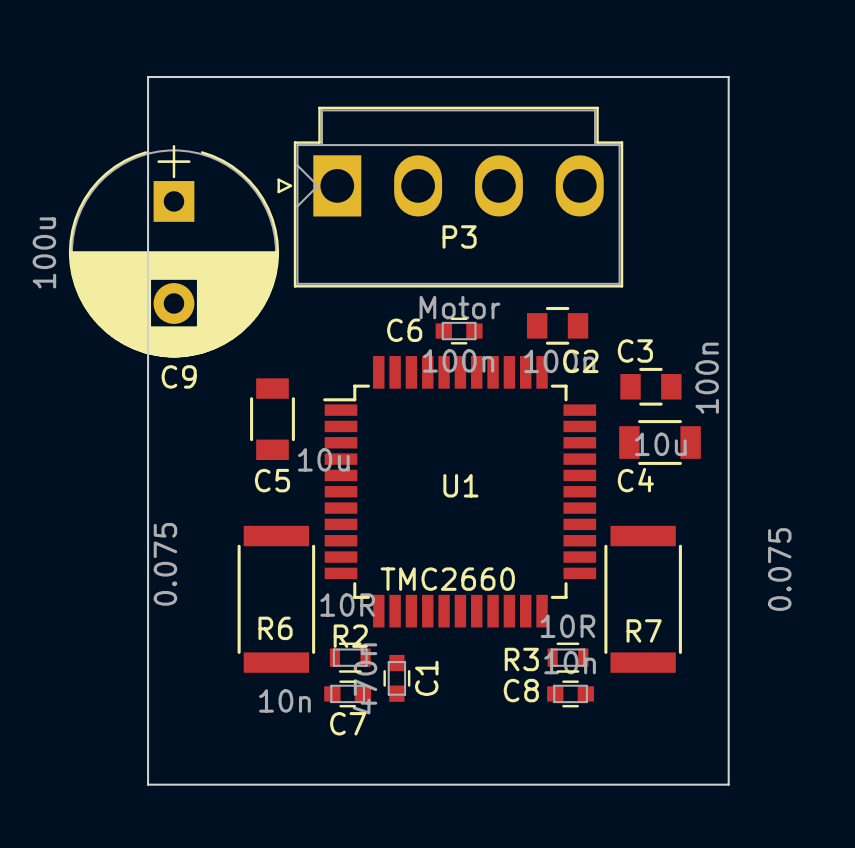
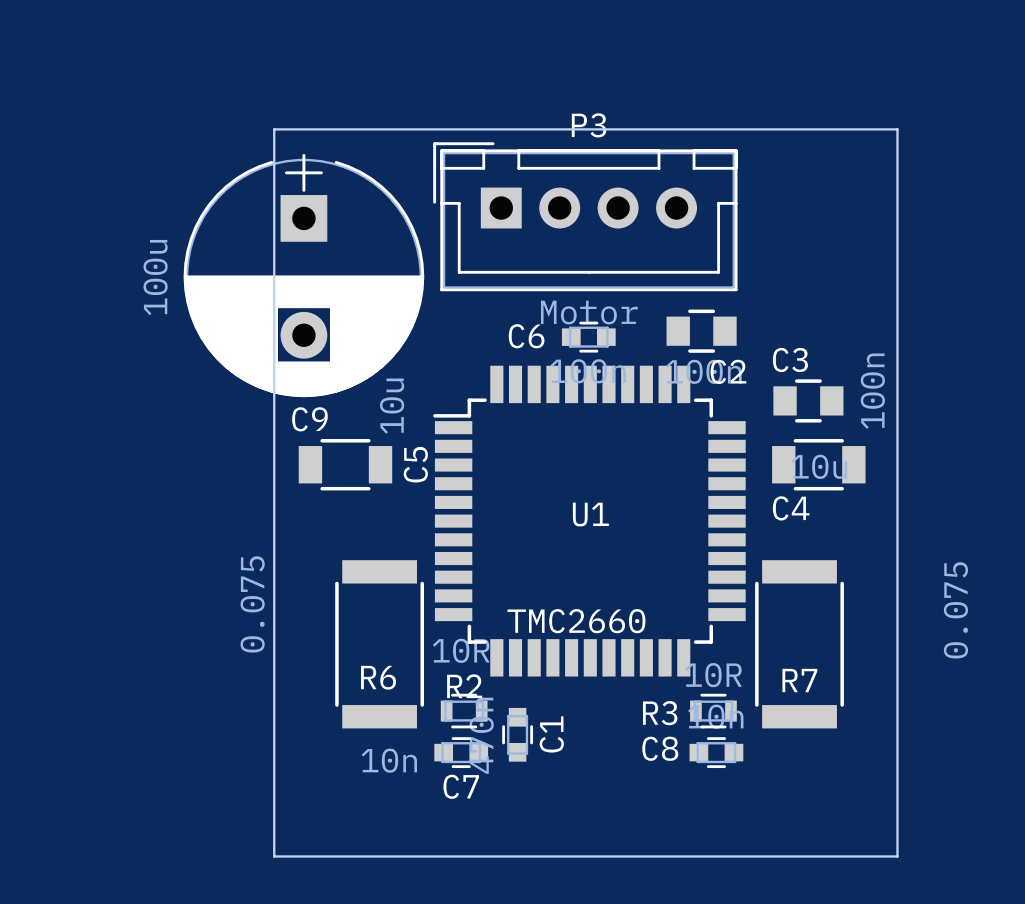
P3 footprint: [277, 106, 624, 288] -> [433, 142, 738, 292]
board edge: (728, 149) (728, 77) (148, 77) (148, 784) (184, 784) -> (897, 129) (274, 129) (274, 856)
P3 name position: P3 (459, 236) -> P3 (589, 125)
C9 position: (173, 251) -> (303, 275)
C5 rotation: 0° (272, 419) -> 90° clockwise (345, 464)
C5 value position: 10u (323, 459) -> 10u (392, 406)
C5 name position: C5 (272, 480) -> C5 (415, 464)

